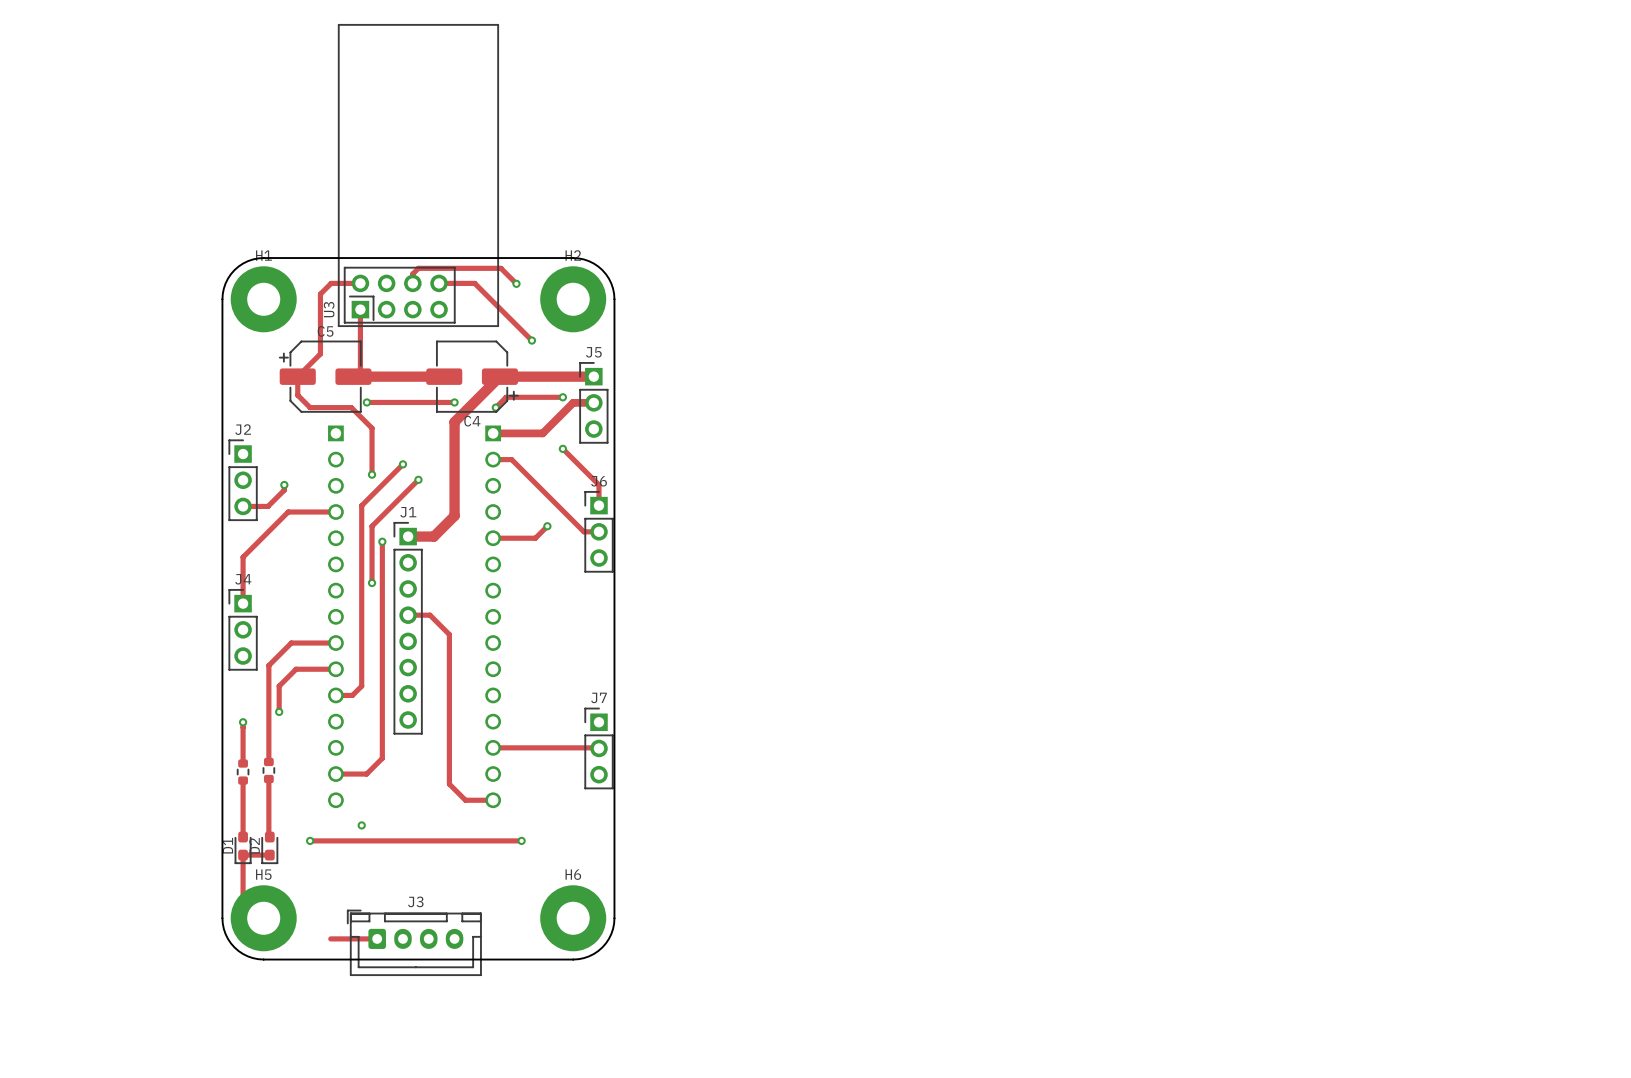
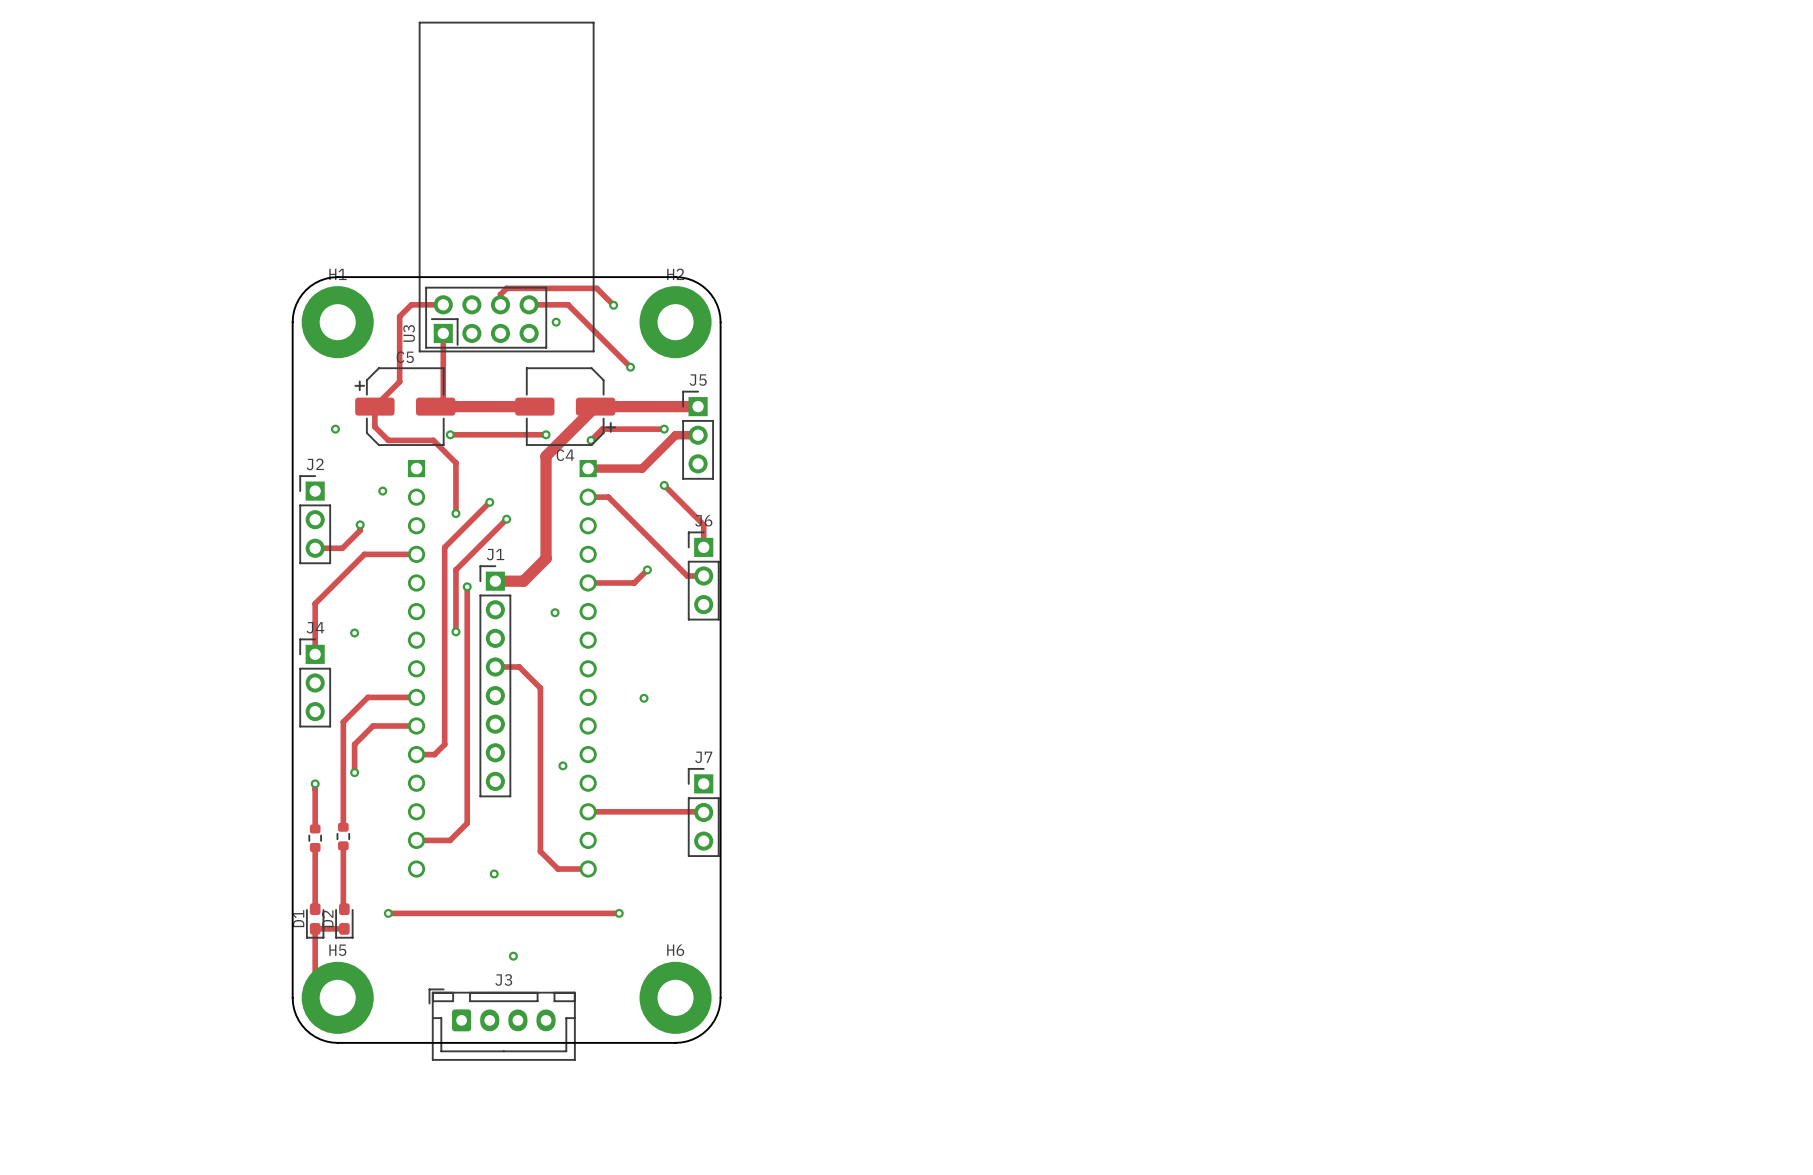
via: none -> (556, 322)
via: none -> (335, 429)
via: none -> (382, 491)
via: none -> (555, 612)
via: none -> (354, 632)
via: none -> (644, 698)
via: none -> (562, 765)
via: none -> (494, 873)
via: (361, 825) -> none
via: none -> (513, 956)
track: (330, 938) (377, 938) -> none

